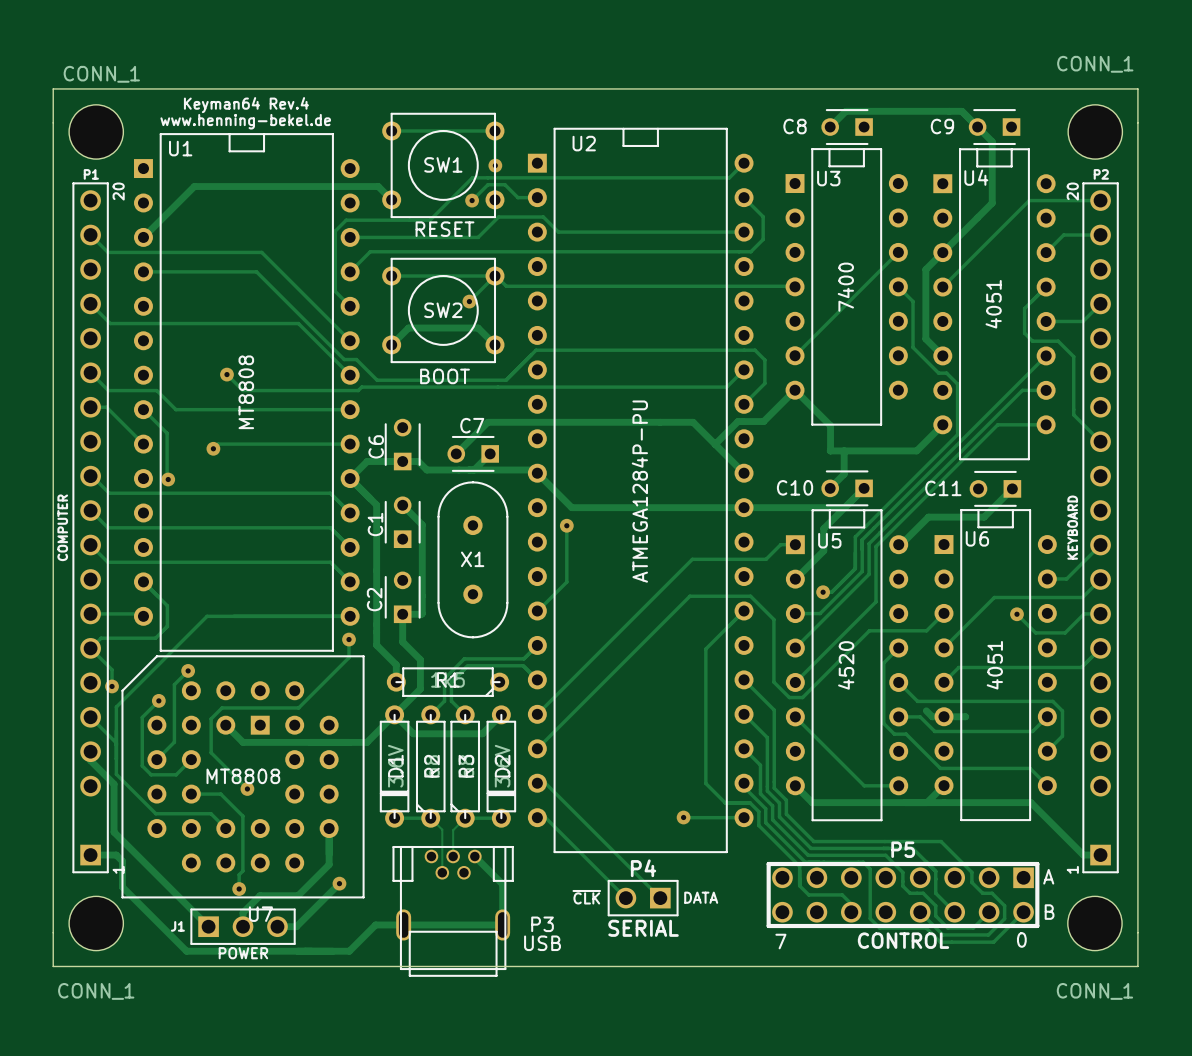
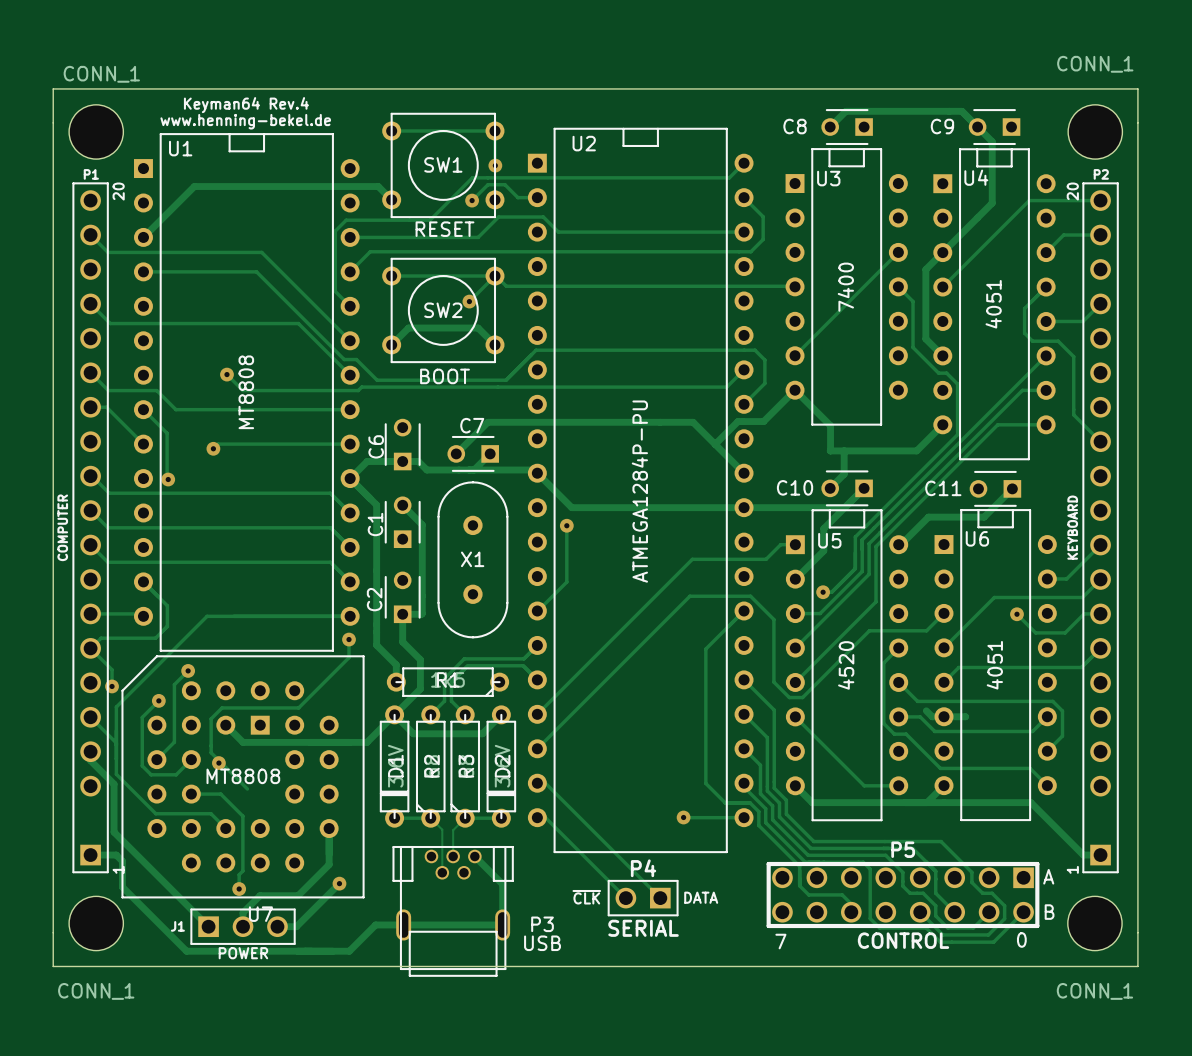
via position: (247, 788) -> (218, 763)

